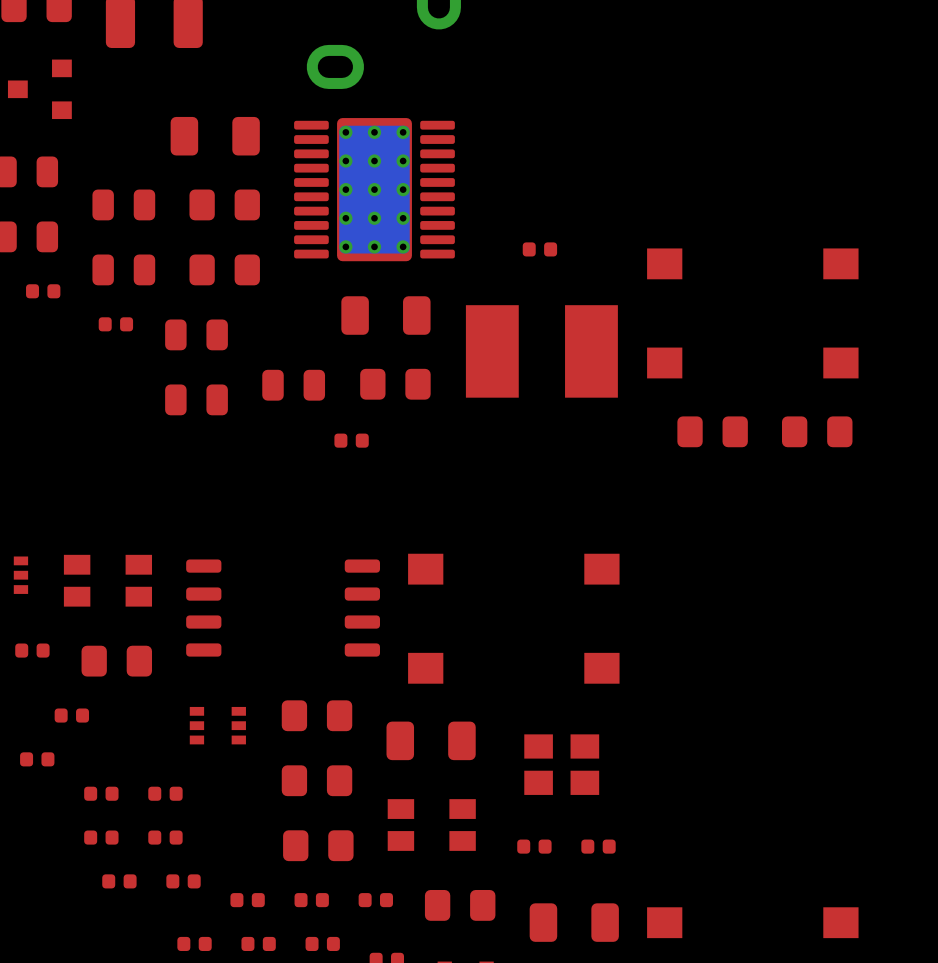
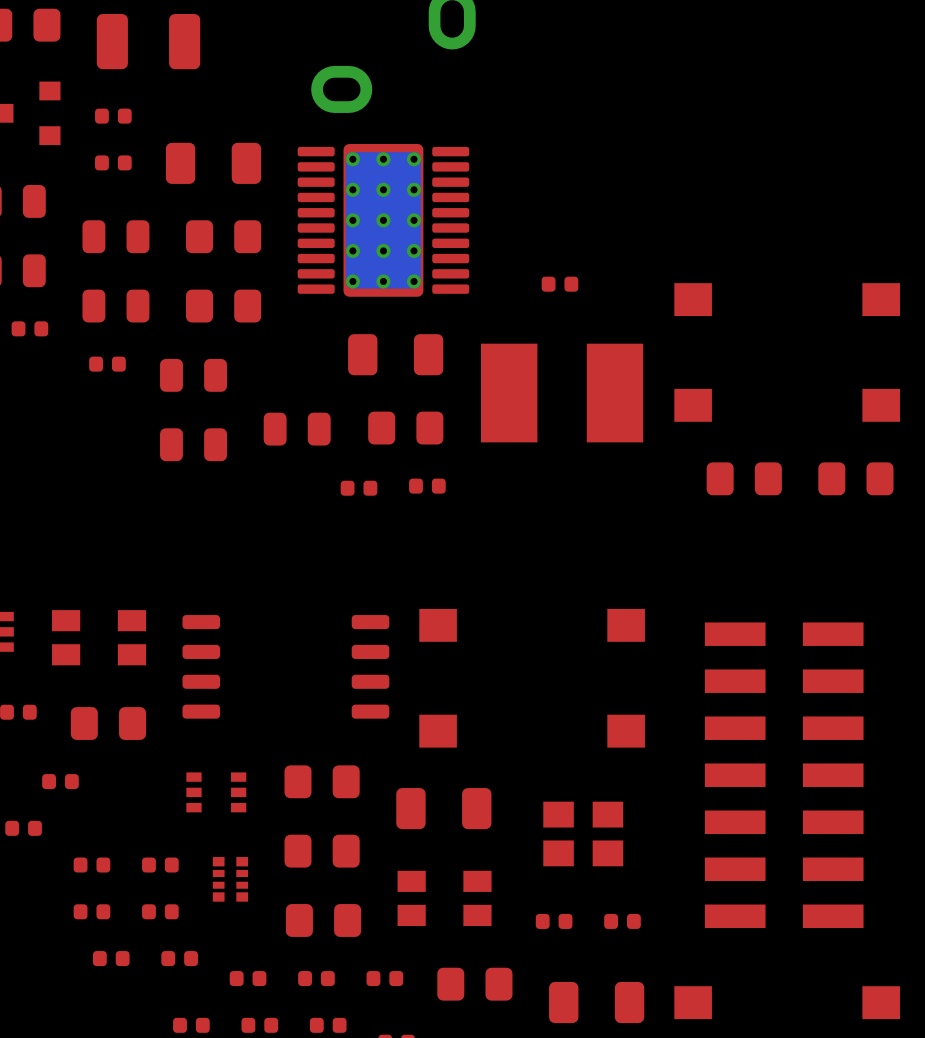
part: none -> (113, 116)
part: none -> (113, 162)
part: none -> (427, 486)
part: none -> (784, 775)
part: none -> (230, 879)

